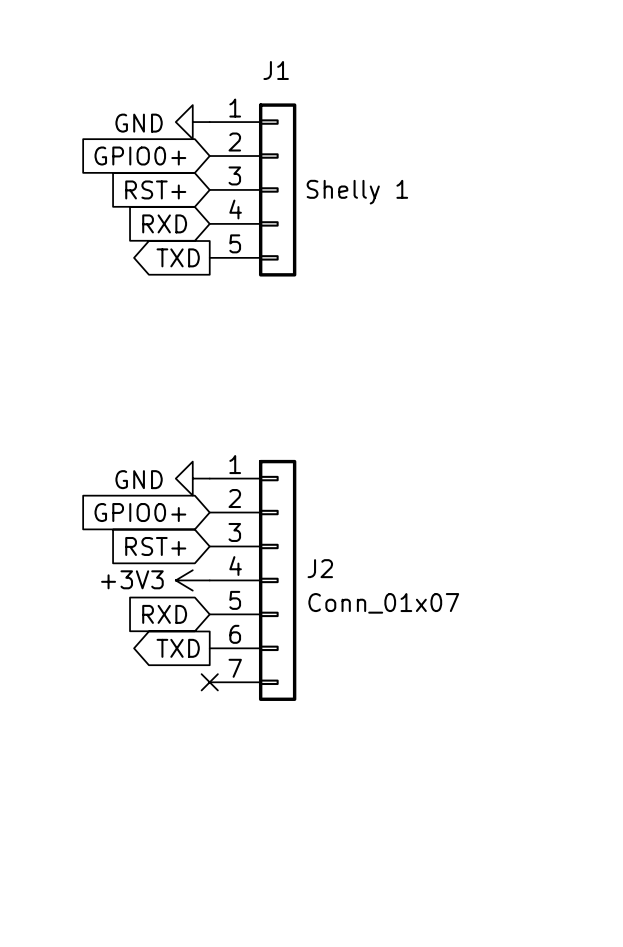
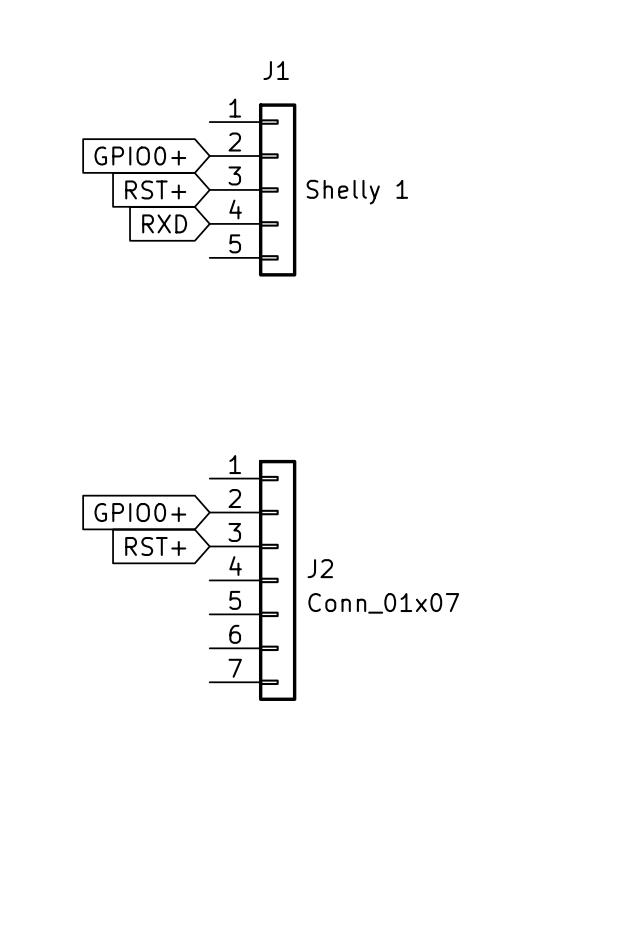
power symbol: GND (192, 122) -> none
global label: TXD (178, 257) -> none
power symbol: GND (192, 478) -> none
power symbol: +3V3 (192, 580) -> none
global label: RXD (164, 614) -> none
global label: TXD (178, 648) -> none
no-connect mark: (209, 682) -> none

